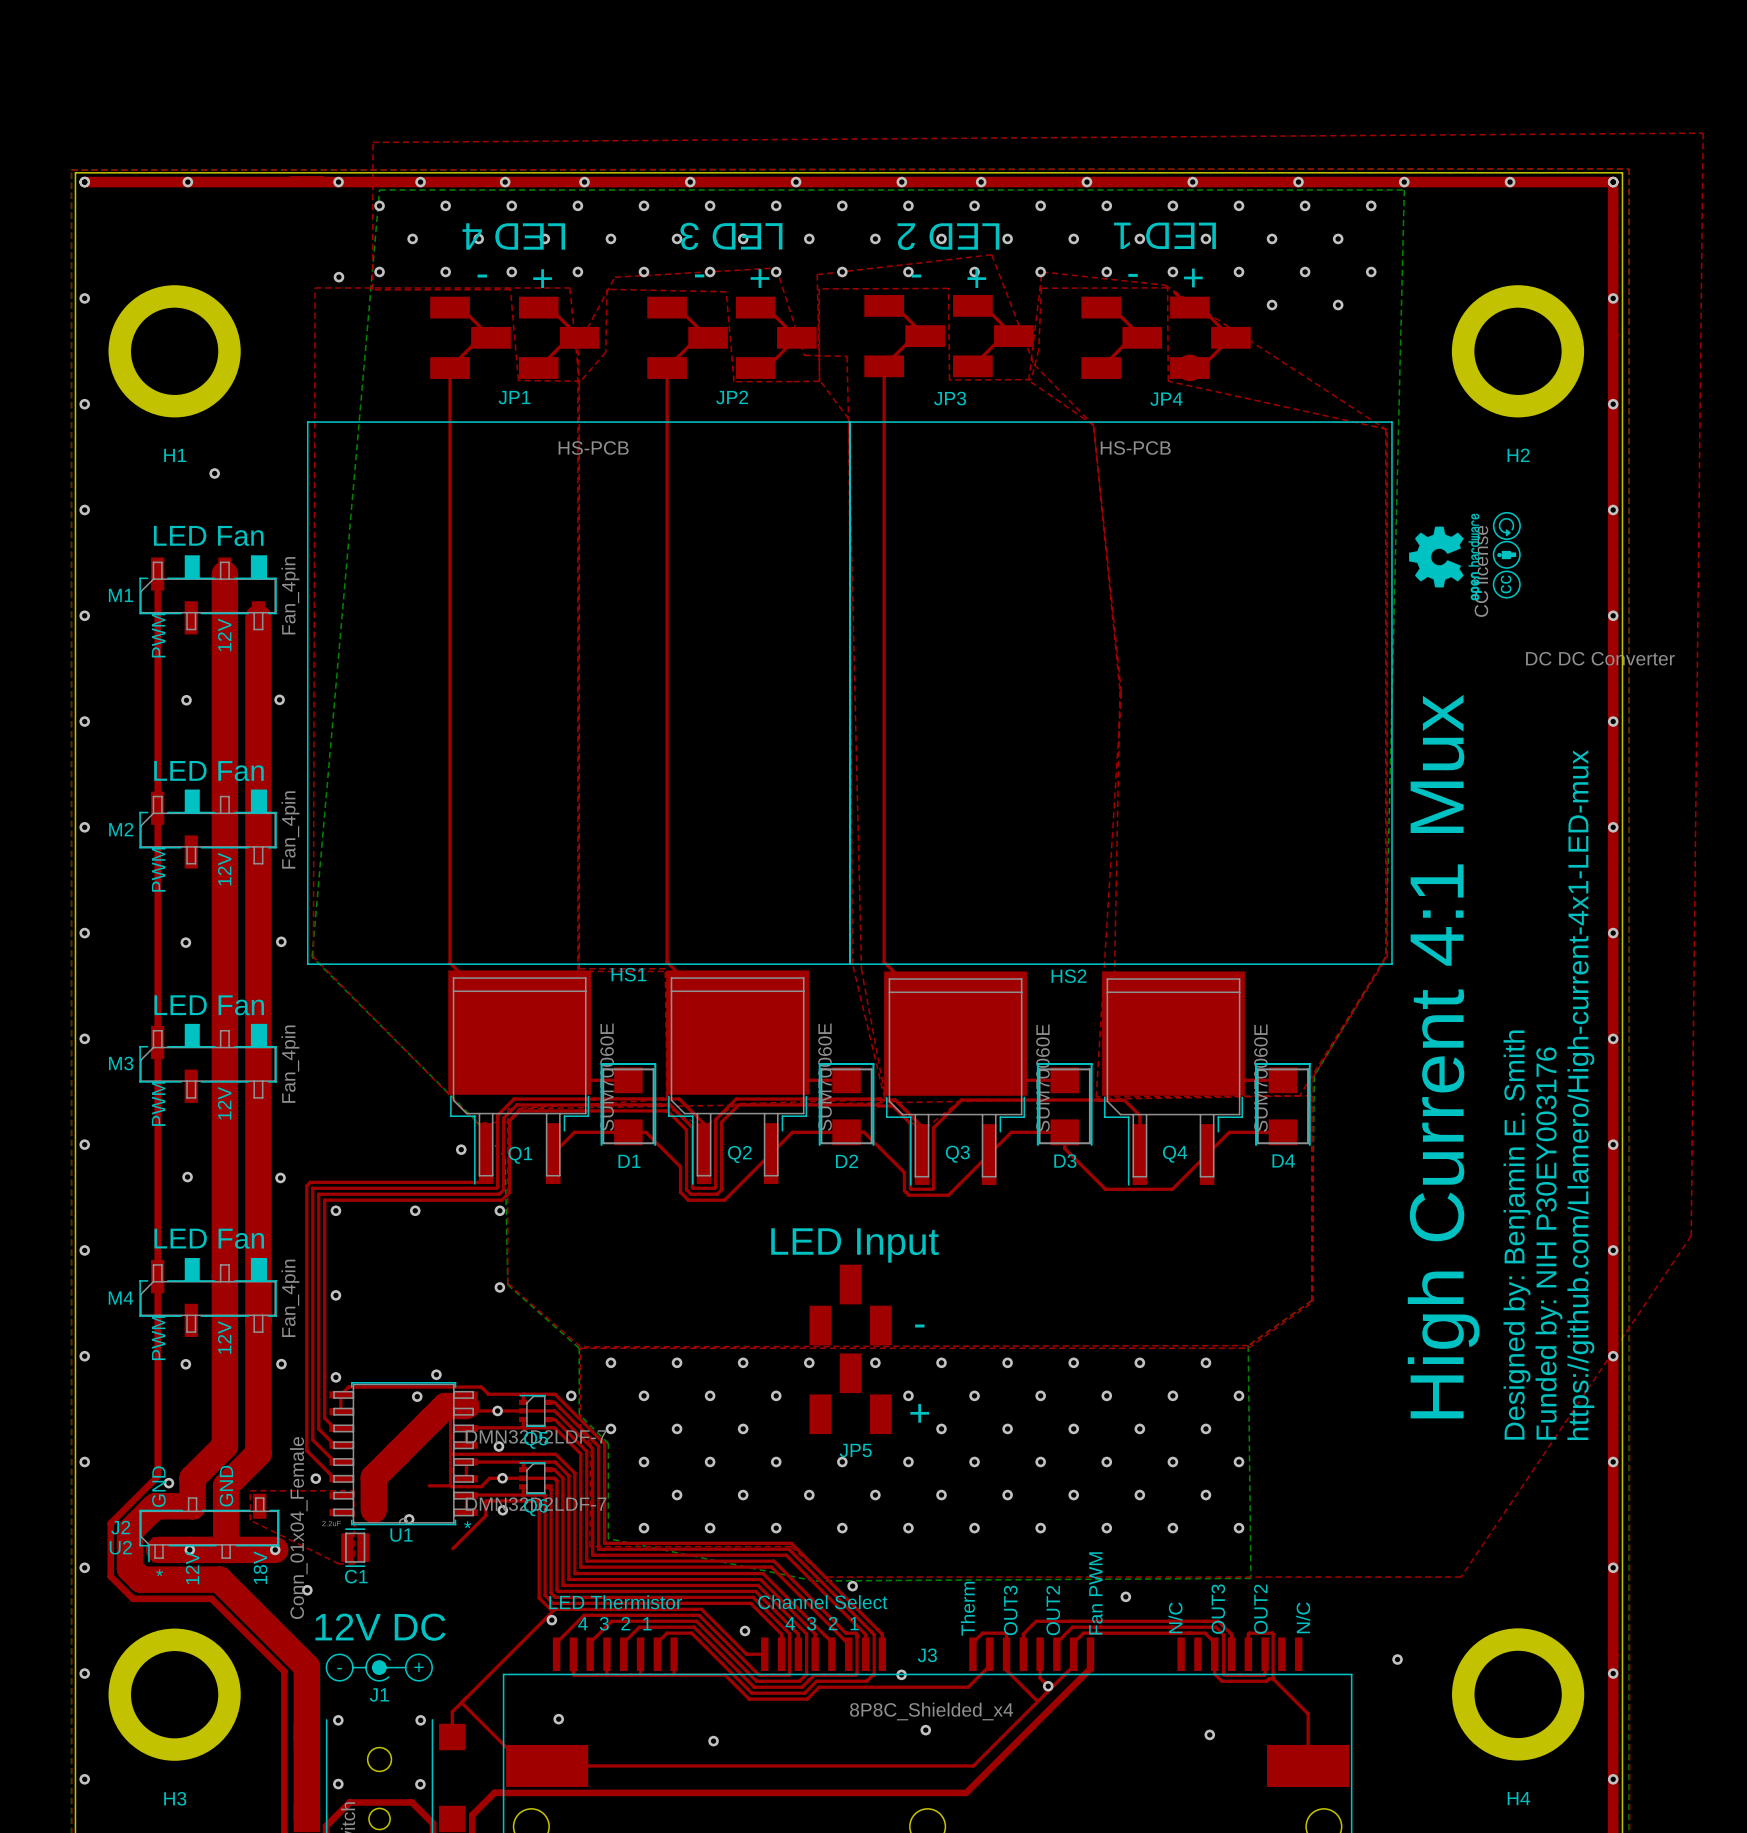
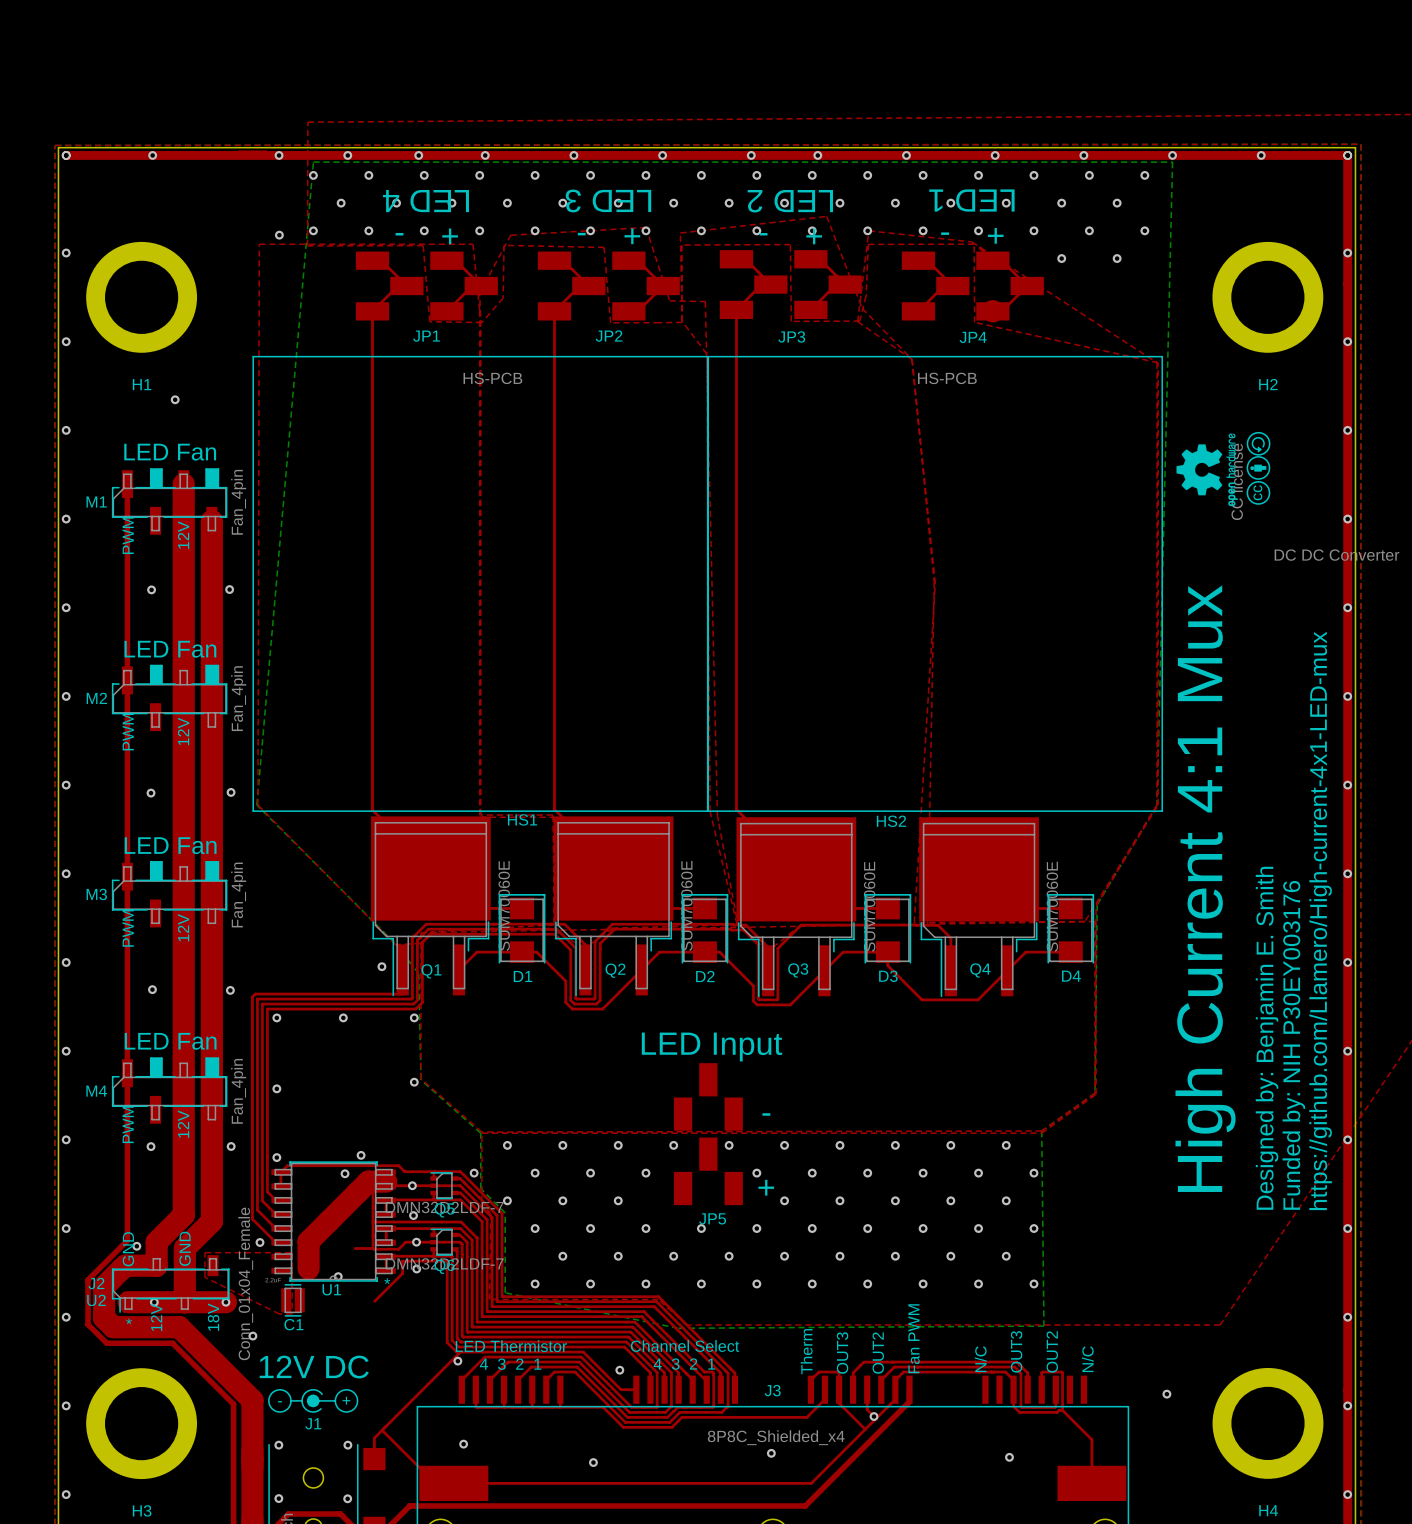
via: (852, 1586) -> none
via: (1125, 1596) -> none
via: (901, 1674) -> none

